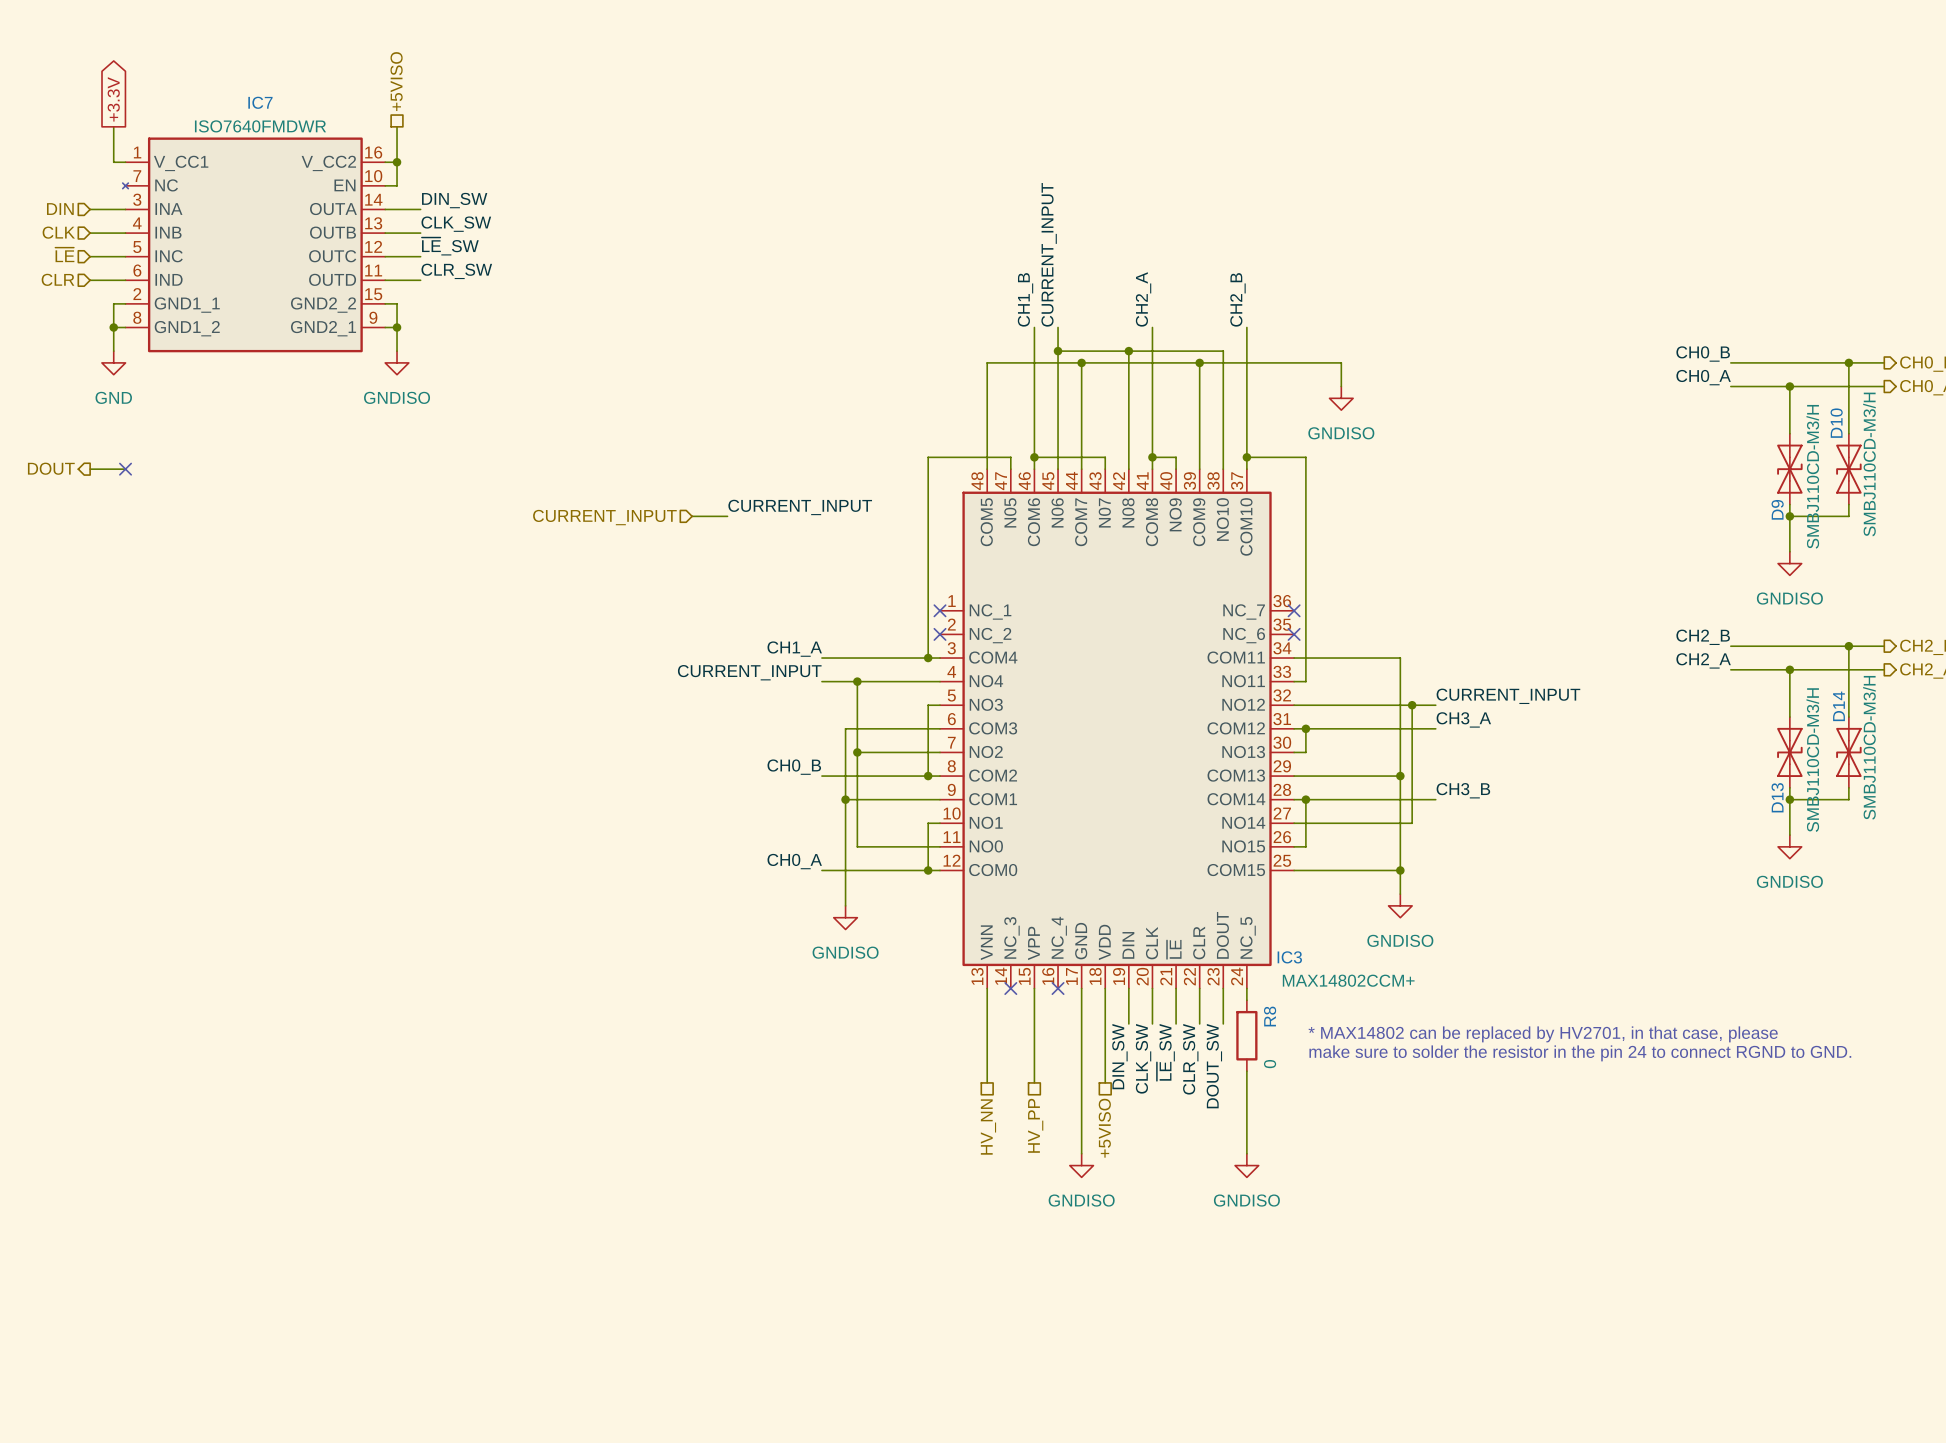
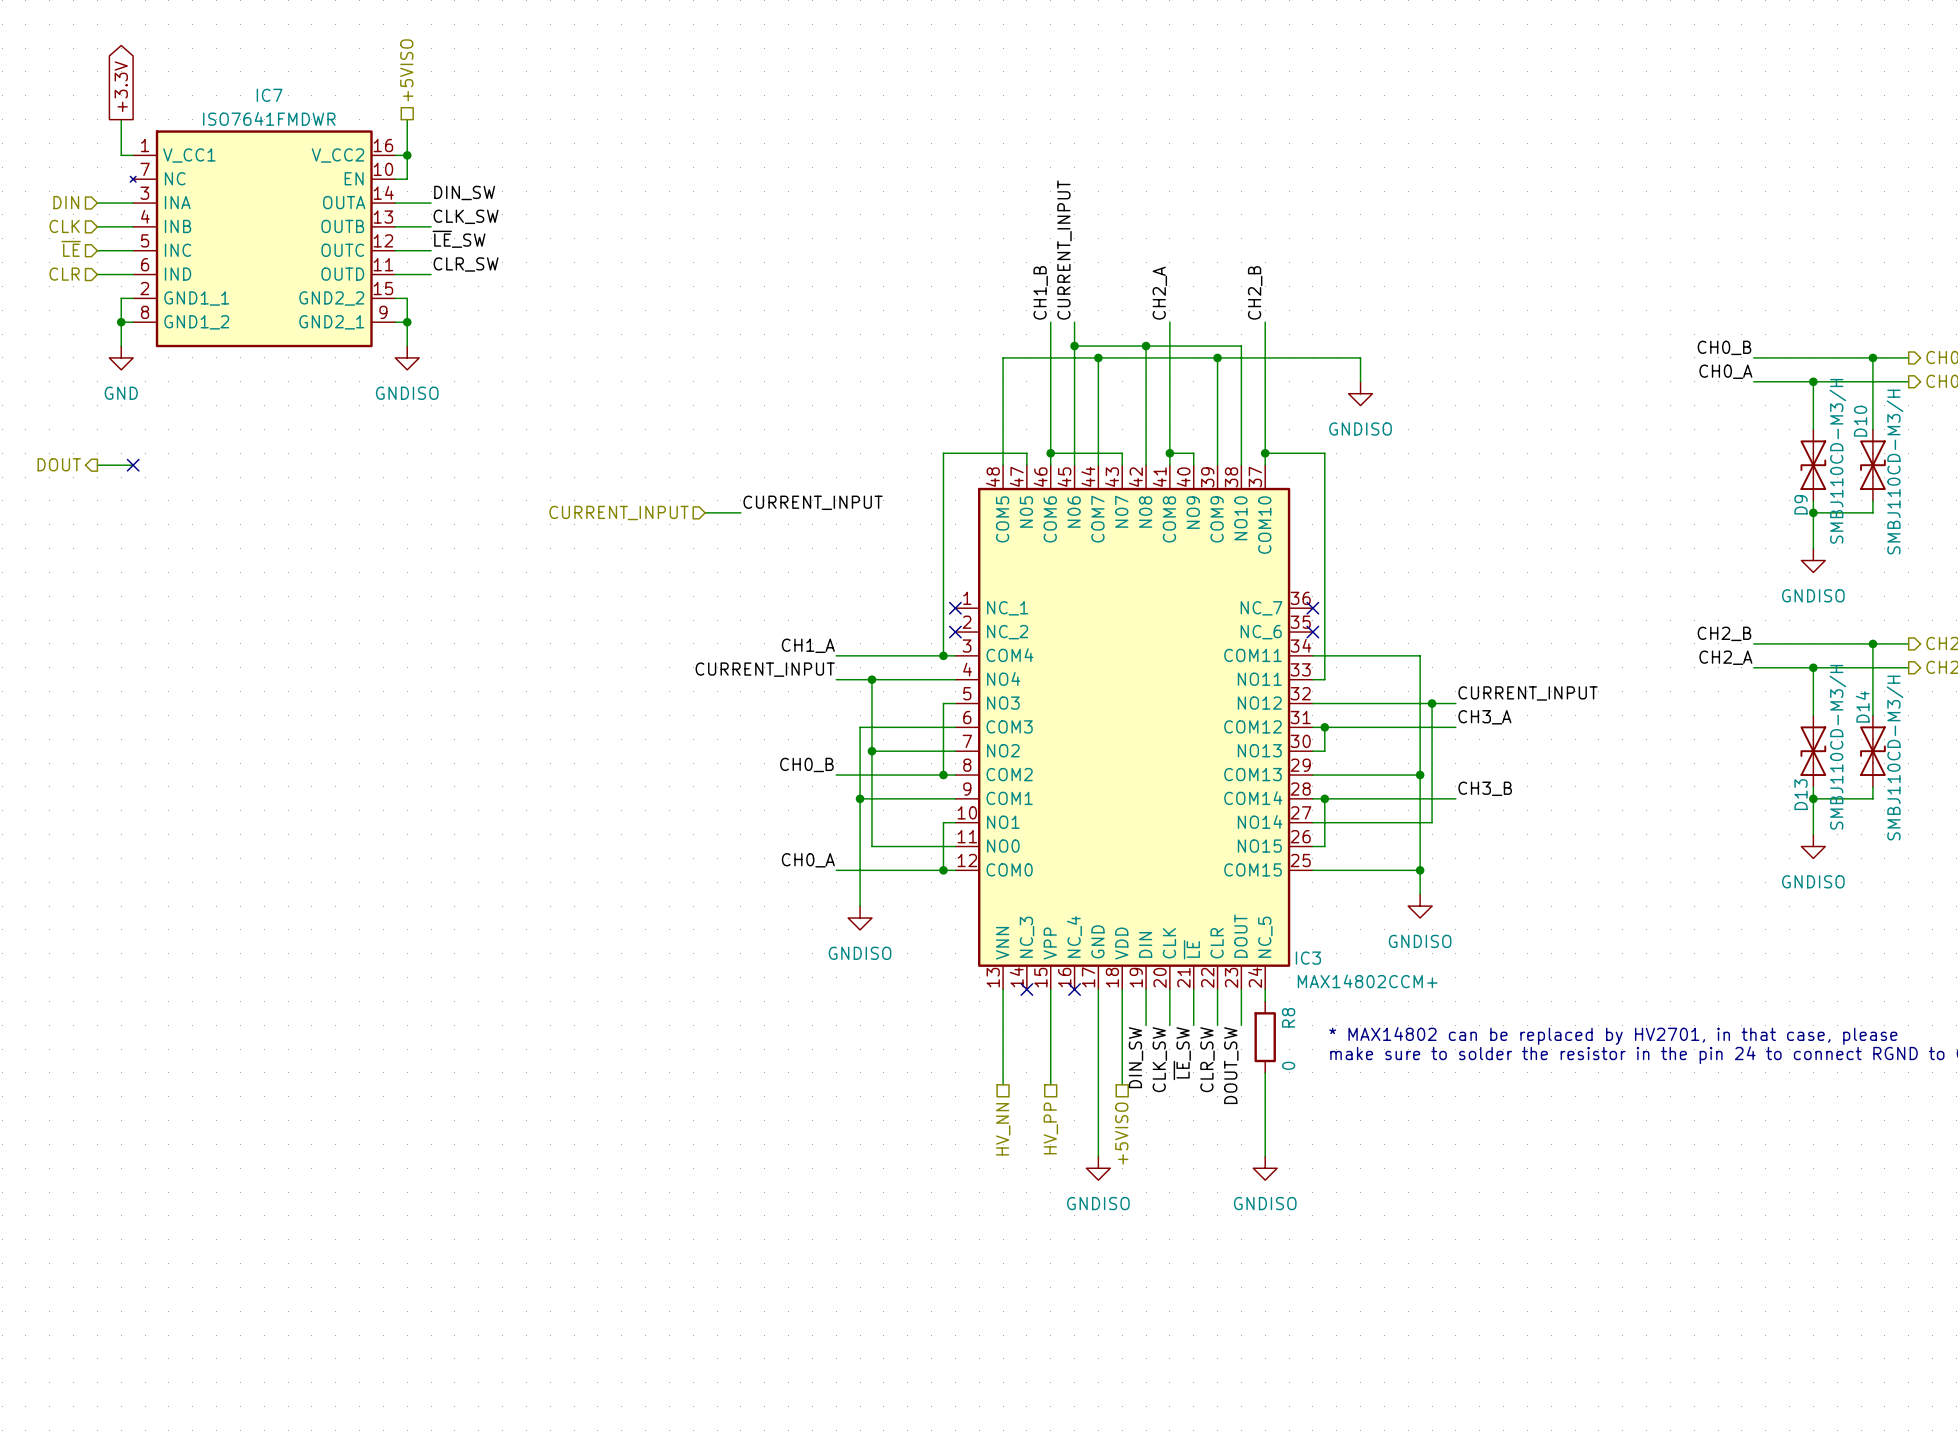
IC7 value: ISO7640FMDWR (260, 126) -> ISO7641FMDWR (269, 118)

